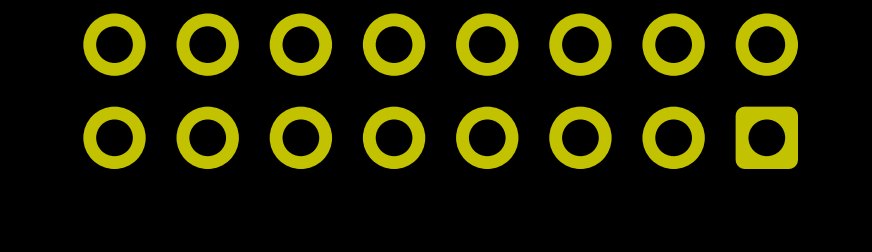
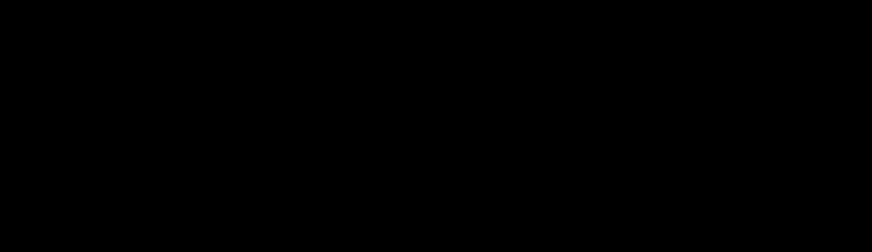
part: (440, 91) -> none

